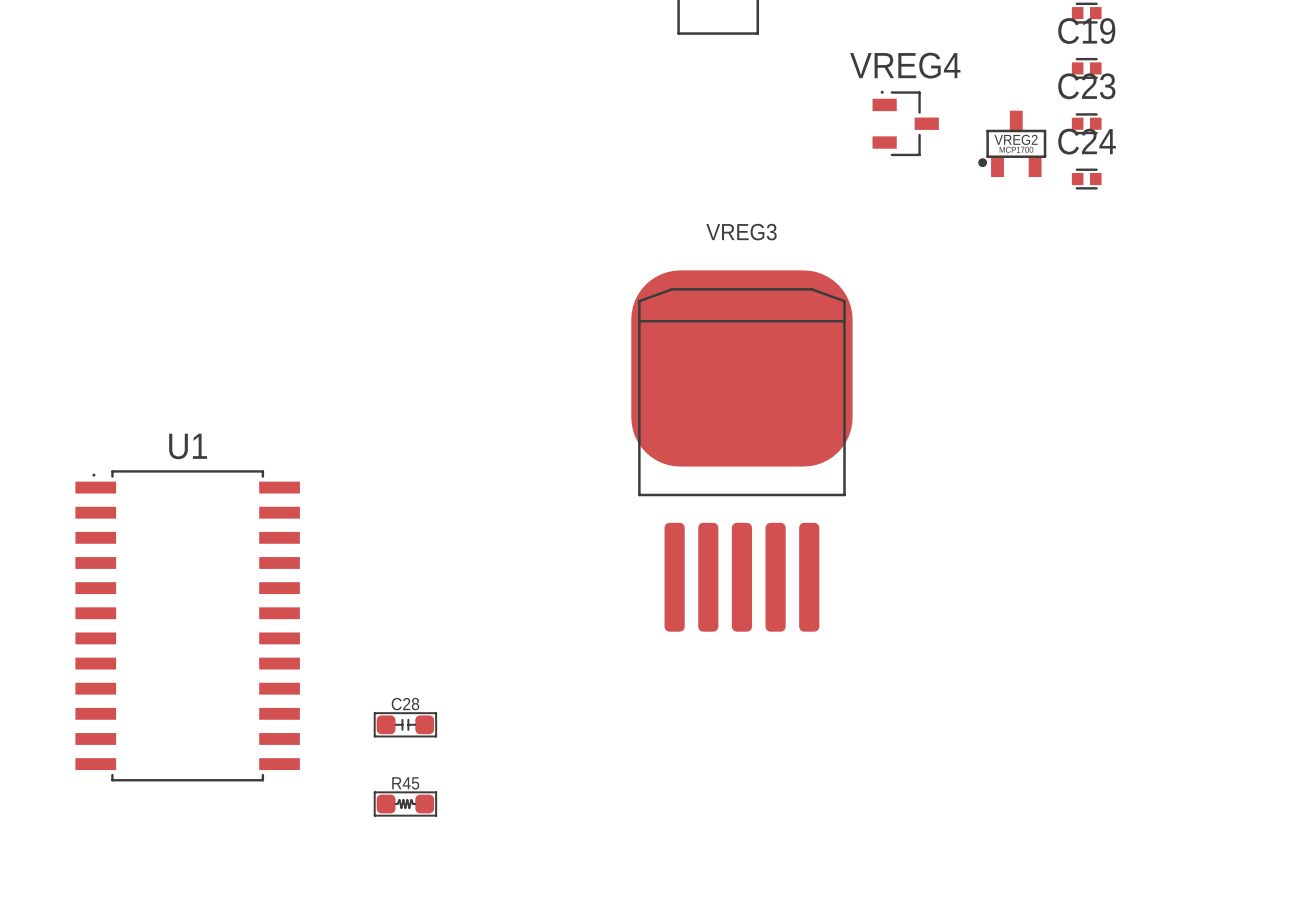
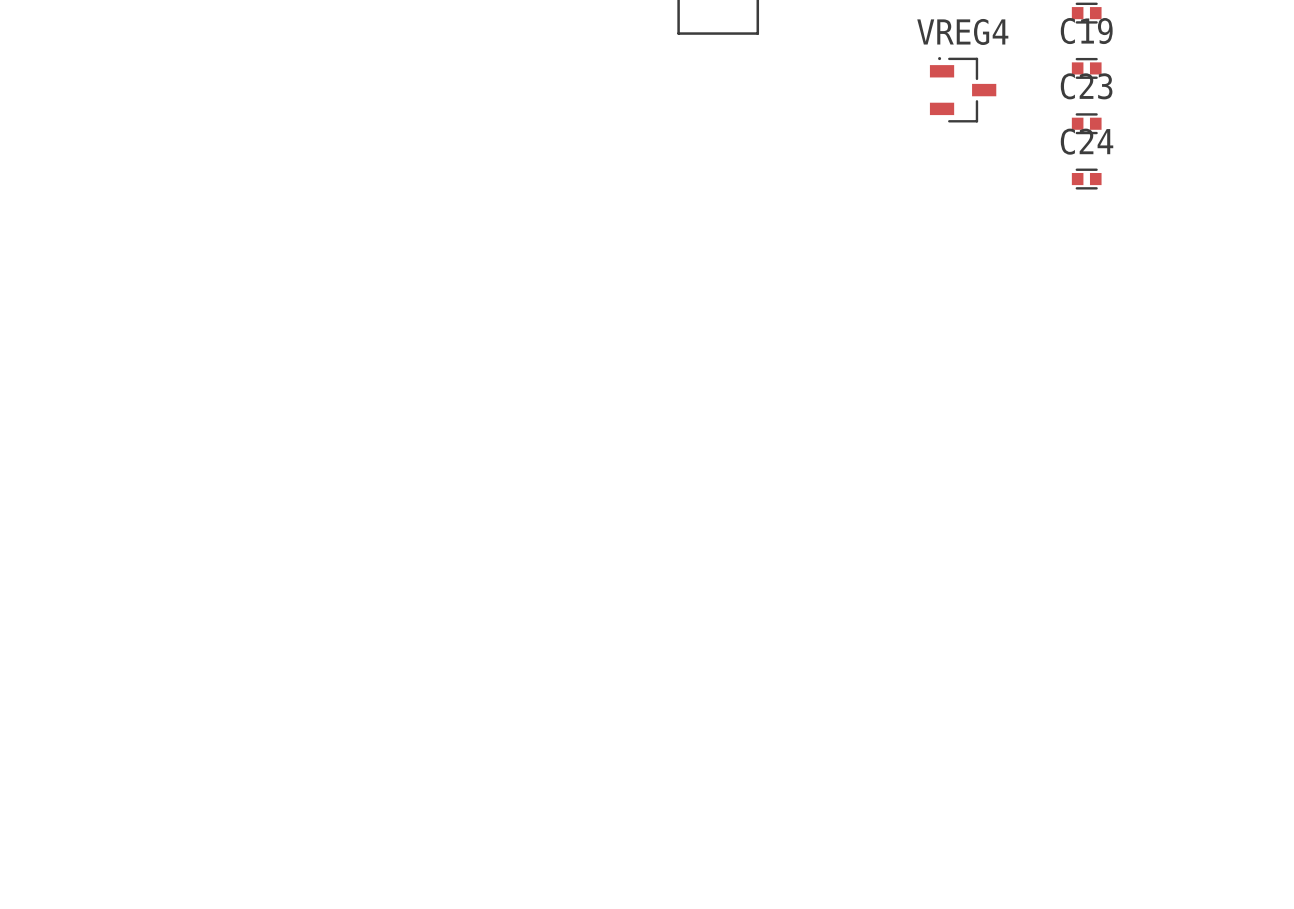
VREG4 position: (905, 123) -> (963, 89)
VREG2: (1012, 143) -> none
VREG3: (741, 451) -> none
U1: (187, 625) -> none
C28: (405, 724) -> none
R45: (405, 804) -> none

